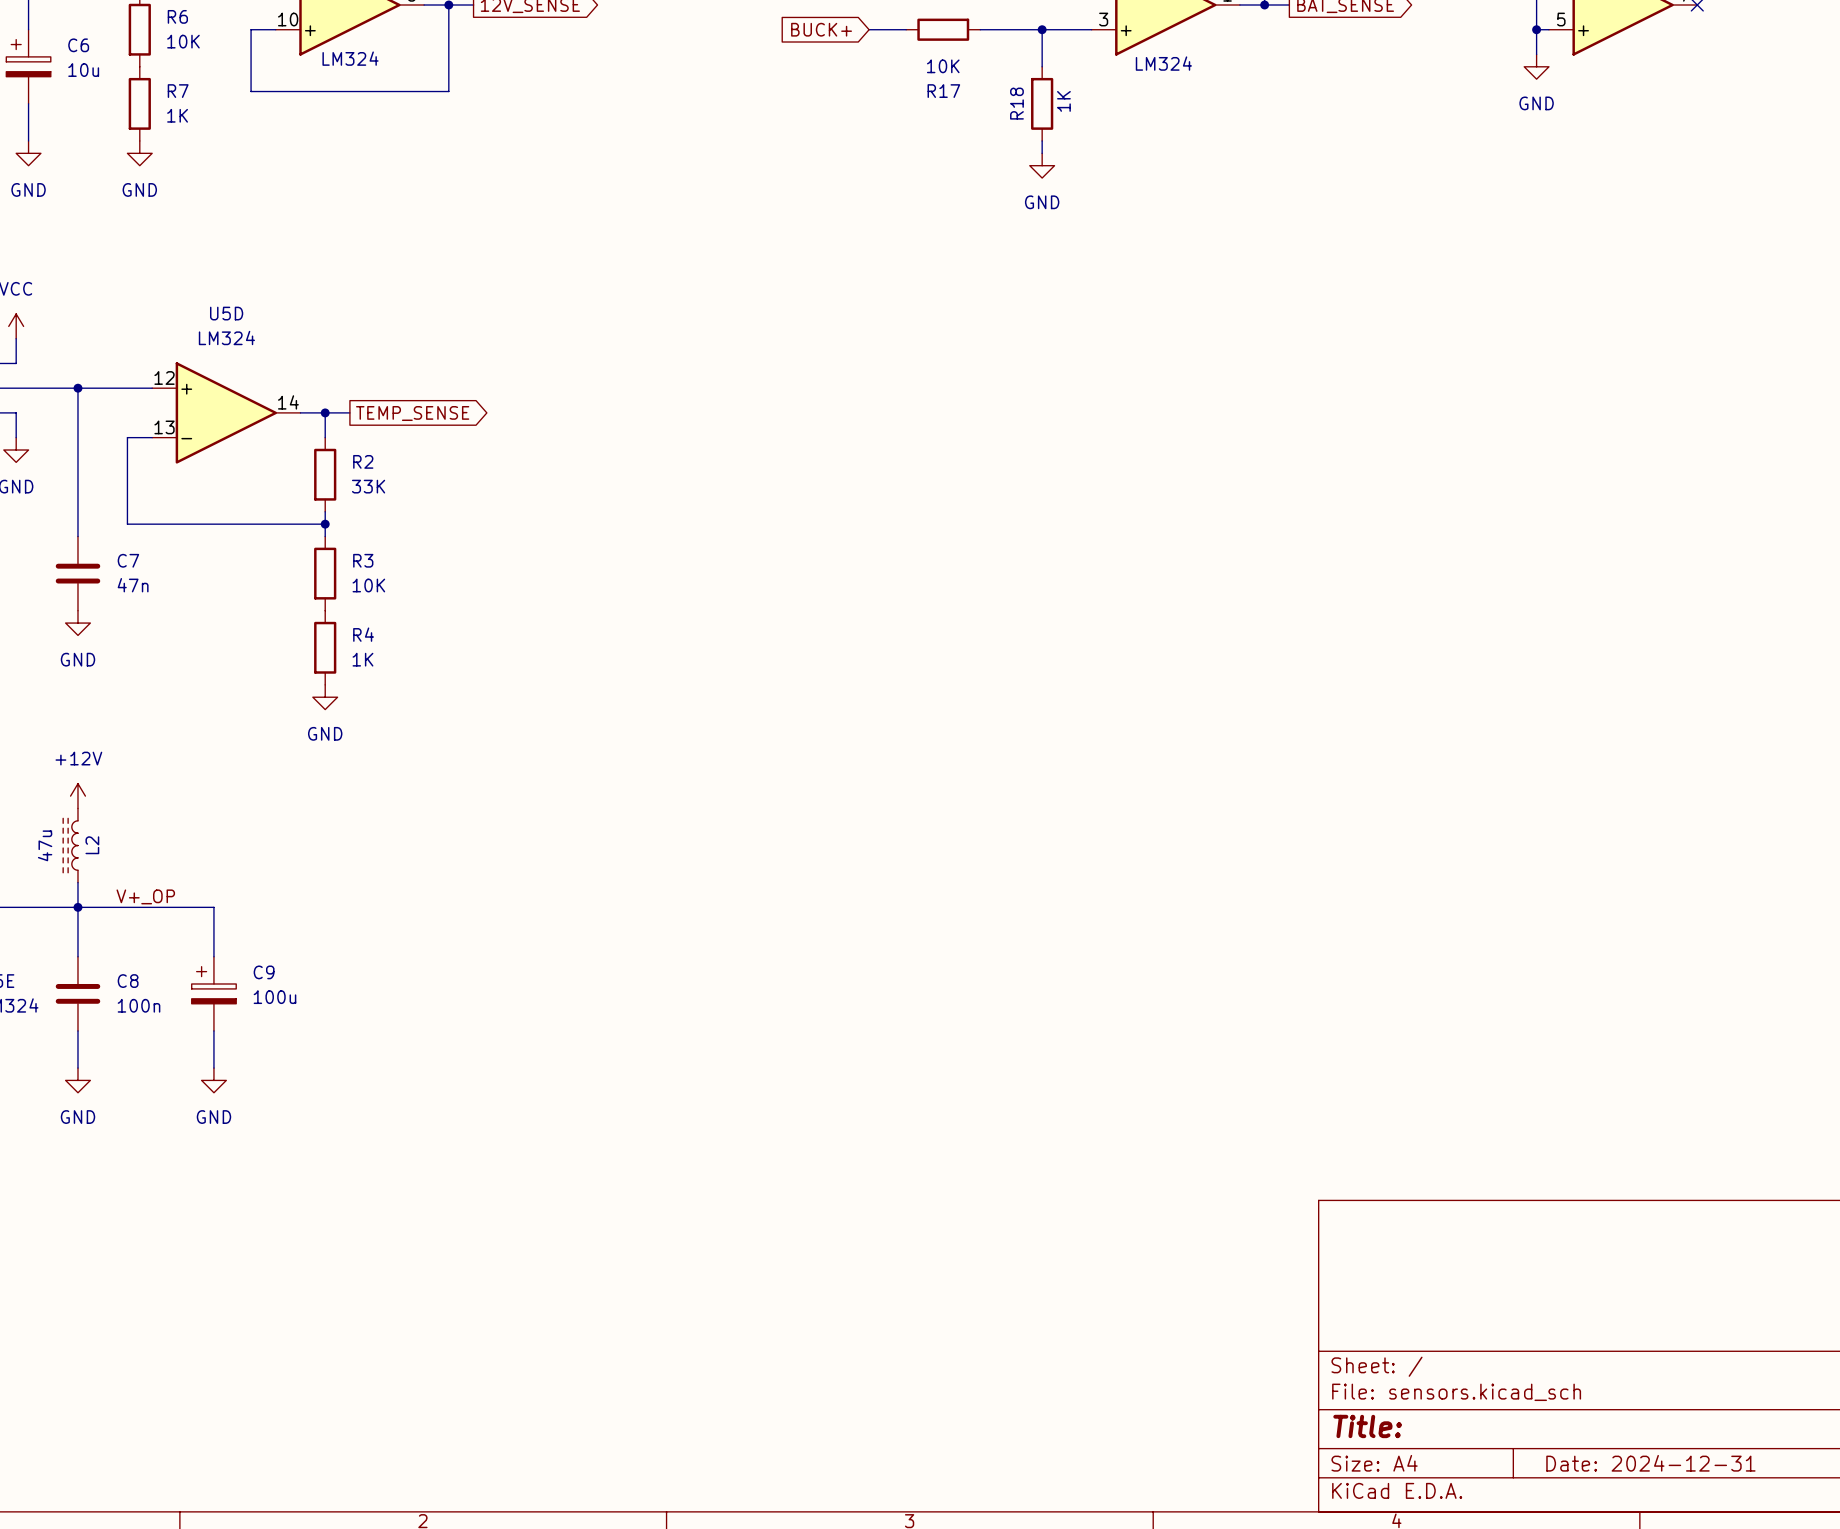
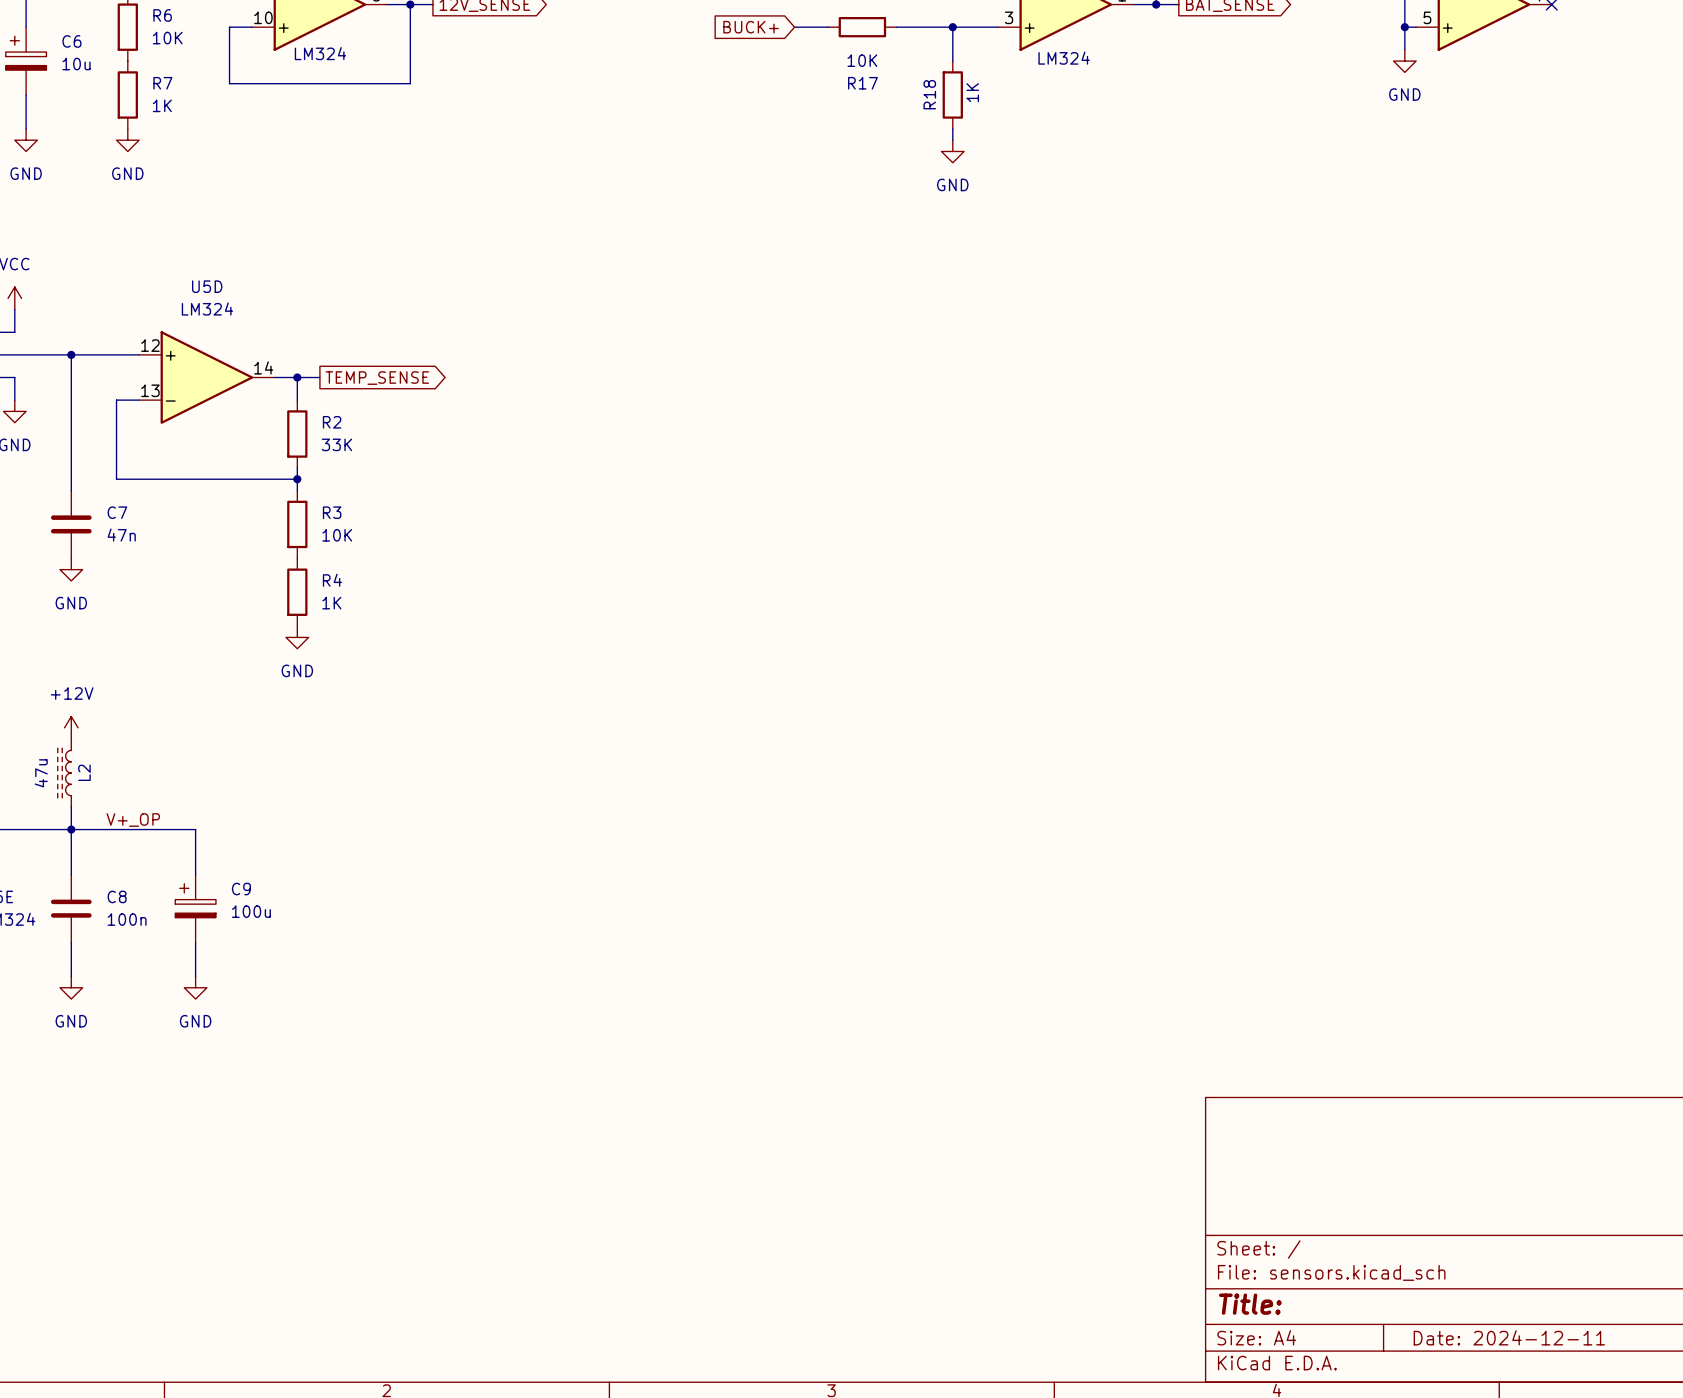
title block: Date: 2024-12-31 (1650, 1463) -> Date: 2024-12-11 (1509, 1337)

